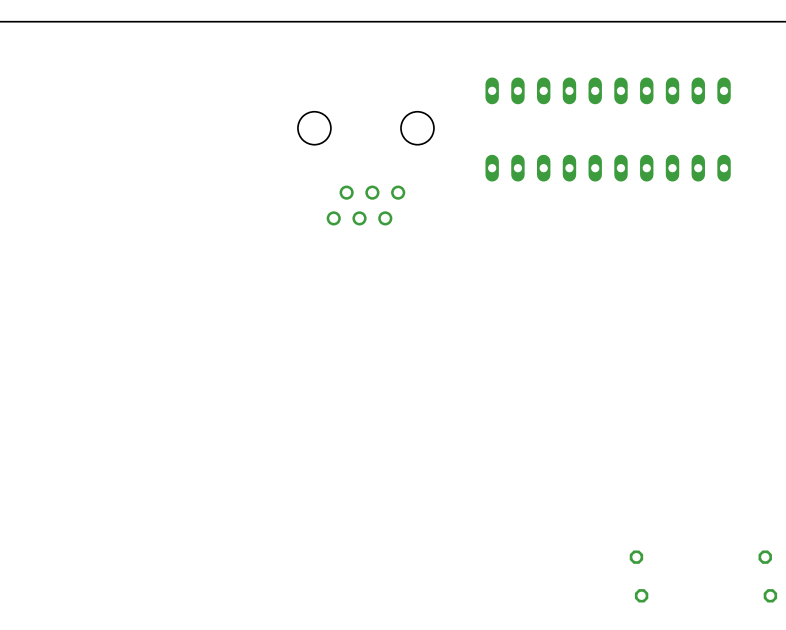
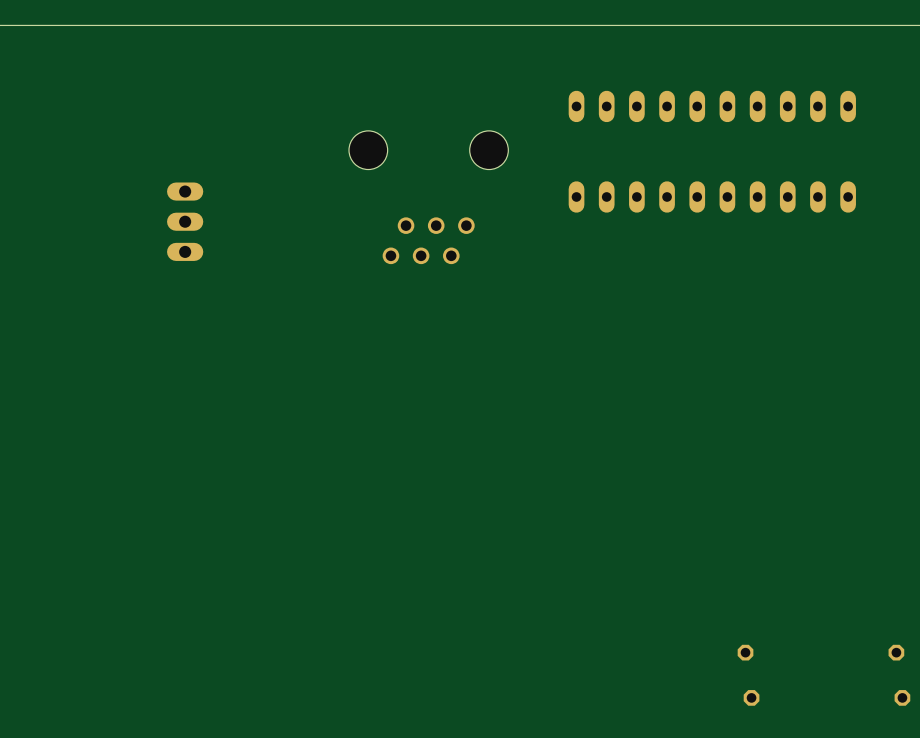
part: none -> (185, 221)

